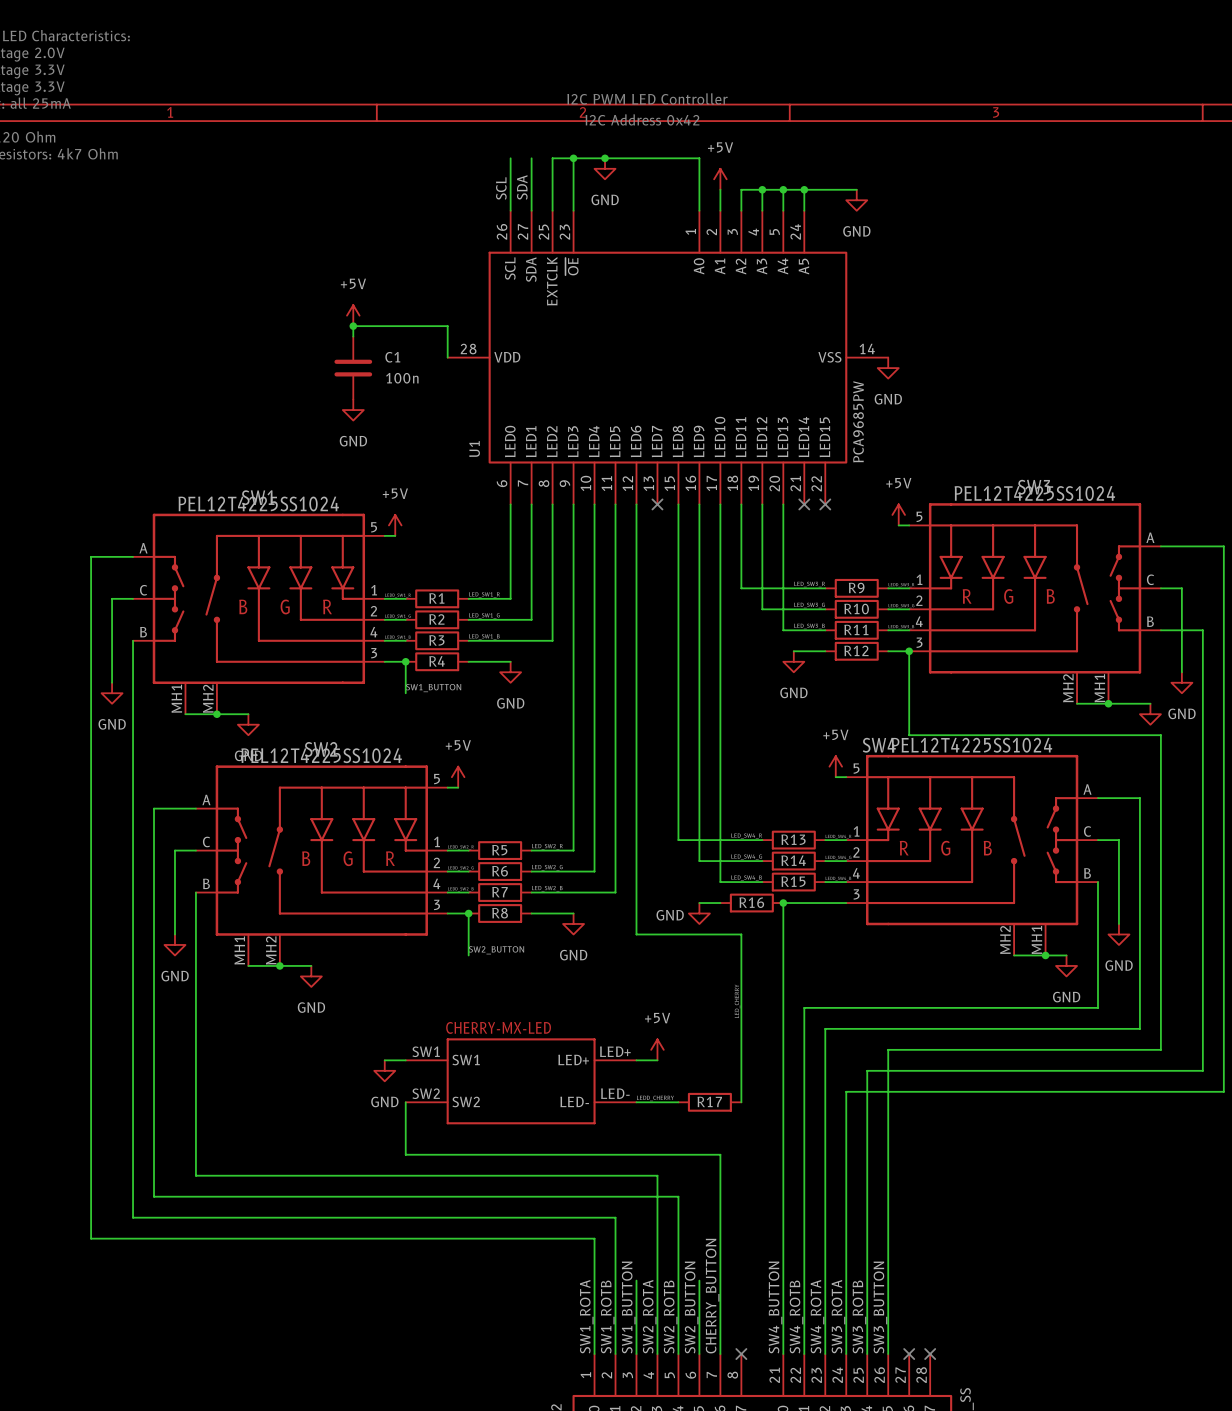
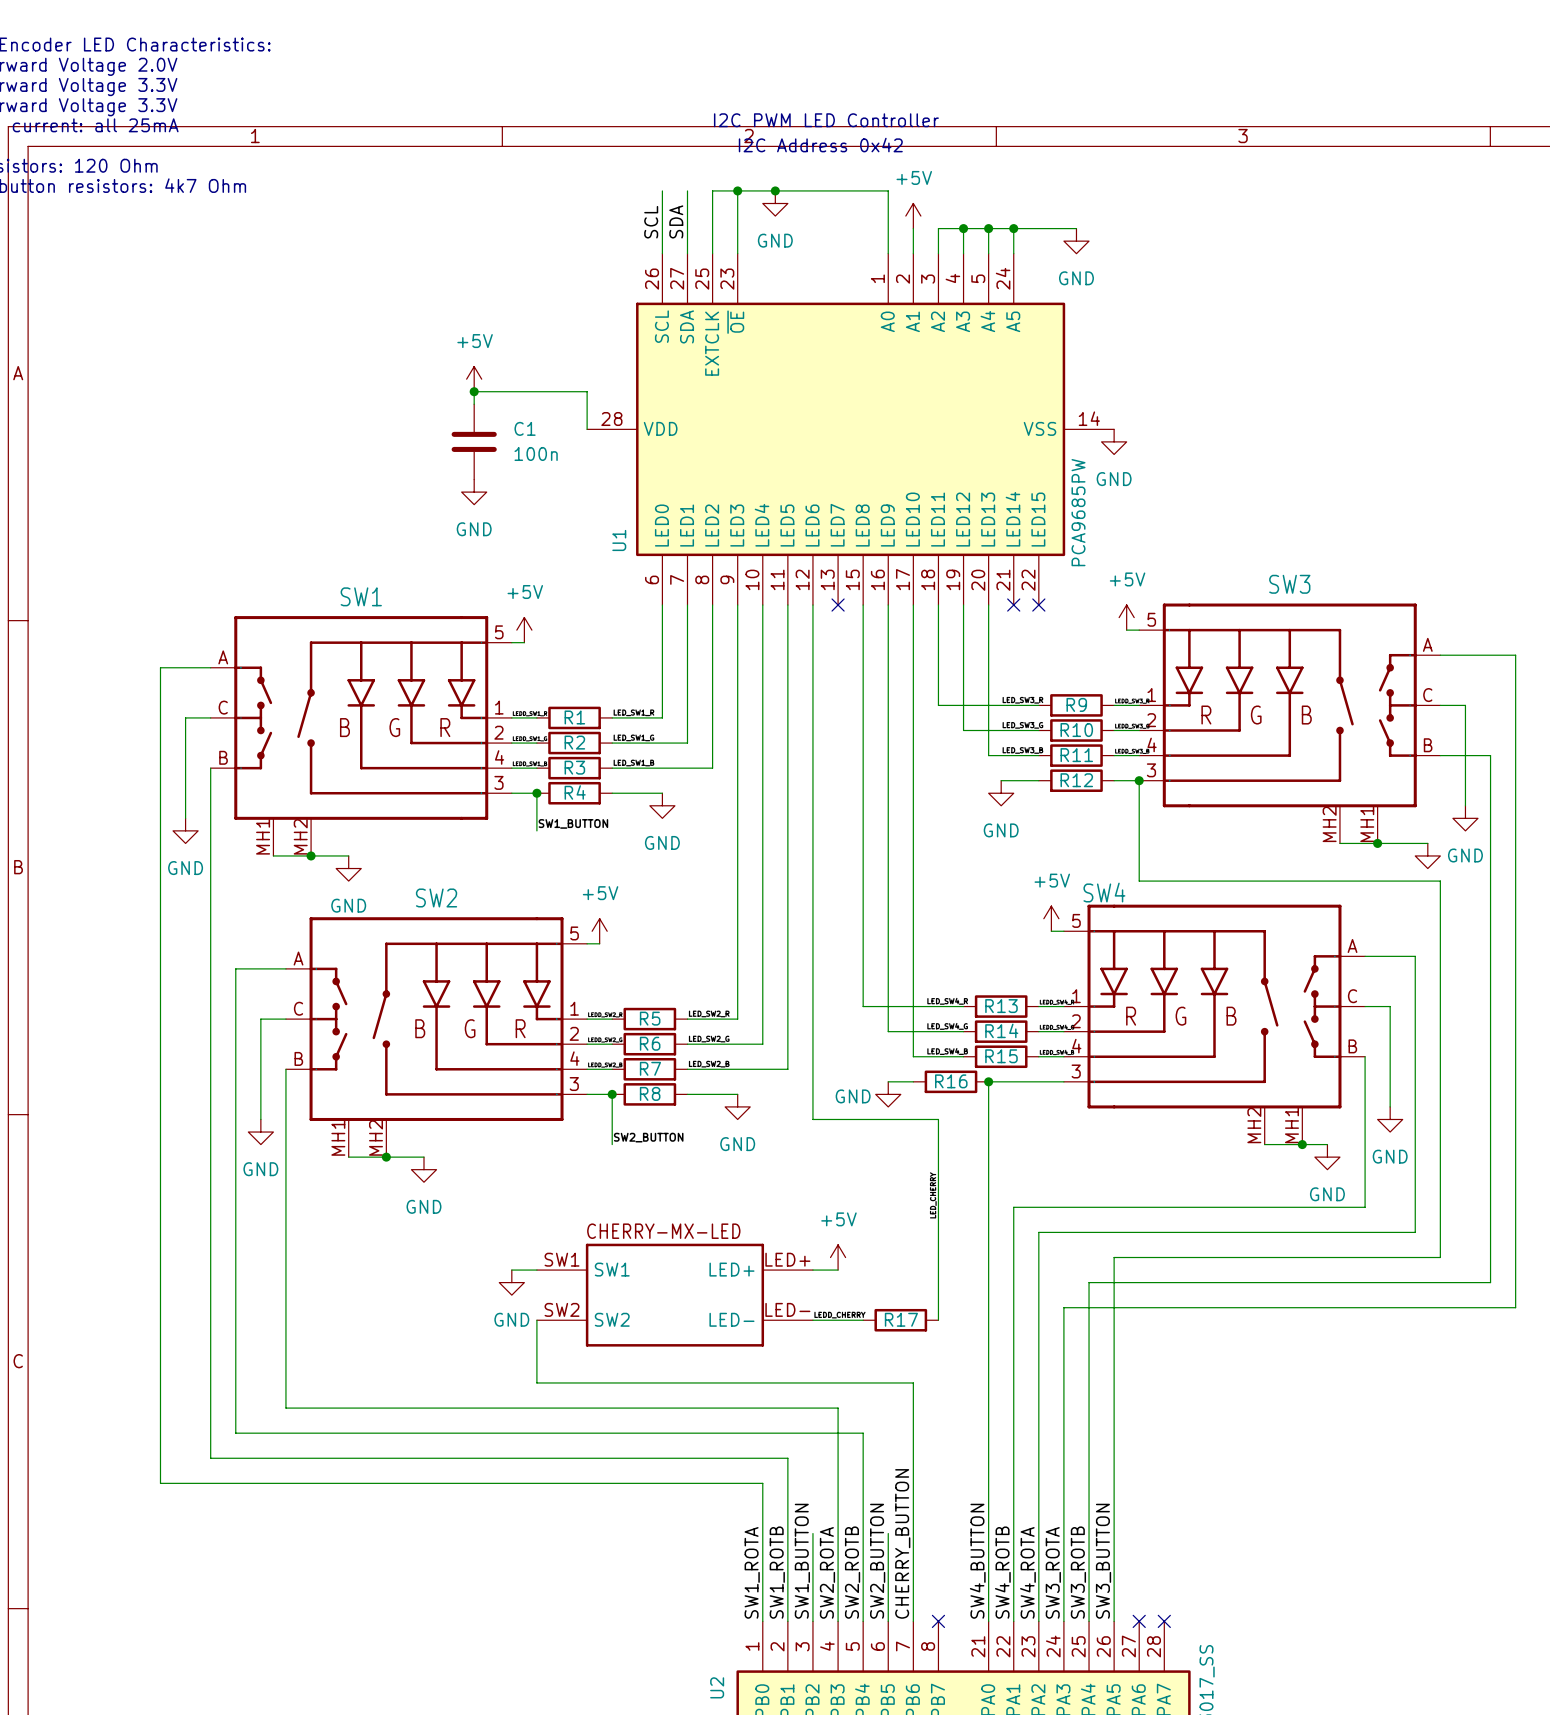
SW3 value: PEL12T4225SS1024 (1034, 493) -> none
SW1 value: PEL12T4225SS1024 (258, 503) -> none
SW4 value: PEL12T4225SS1024 (971, 745) -> none
SW2 value: PEL12T4225SS1024 (321, 755) -> none

